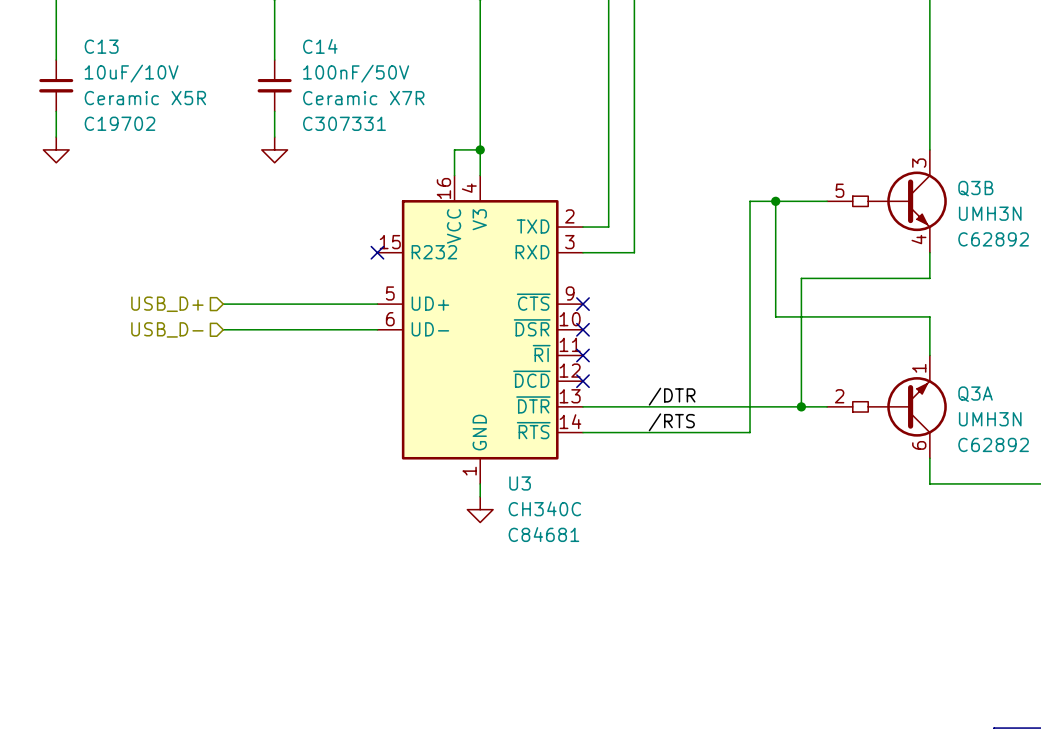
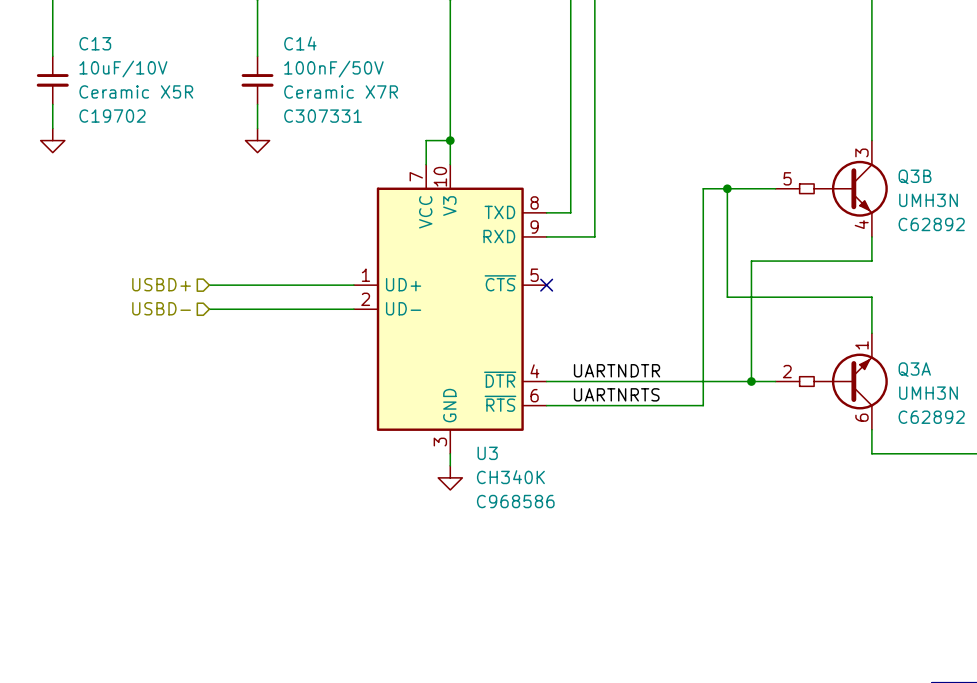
U3 symbol: [377, 175, 584, 484] -> [353, 164, 547, 454]
no-connect mark: (377, 252) -> none
hierarchical label: USB_D+ (167, 304) -> USBD+ (161, 284)
hierarchical label: USB_D- (167, 329) -> USBD- (161, 308)
no-connect mark: (583, 329) -> none
no-connect mark: (583, 355) -> none
no-connect mark: (583, 381) -> none
label: none -> UARTNDTR (617, 370)
label: /DTR (672, 396) -> none
label: none -> UARTNRTS (616, 394)
label: /RTS (671, 422) -> none
U3 value: CH340C (544, 508) -> CH340K (510, 477)
U3 text: C84681 (543, 534) -> C968586 (515, 501)

